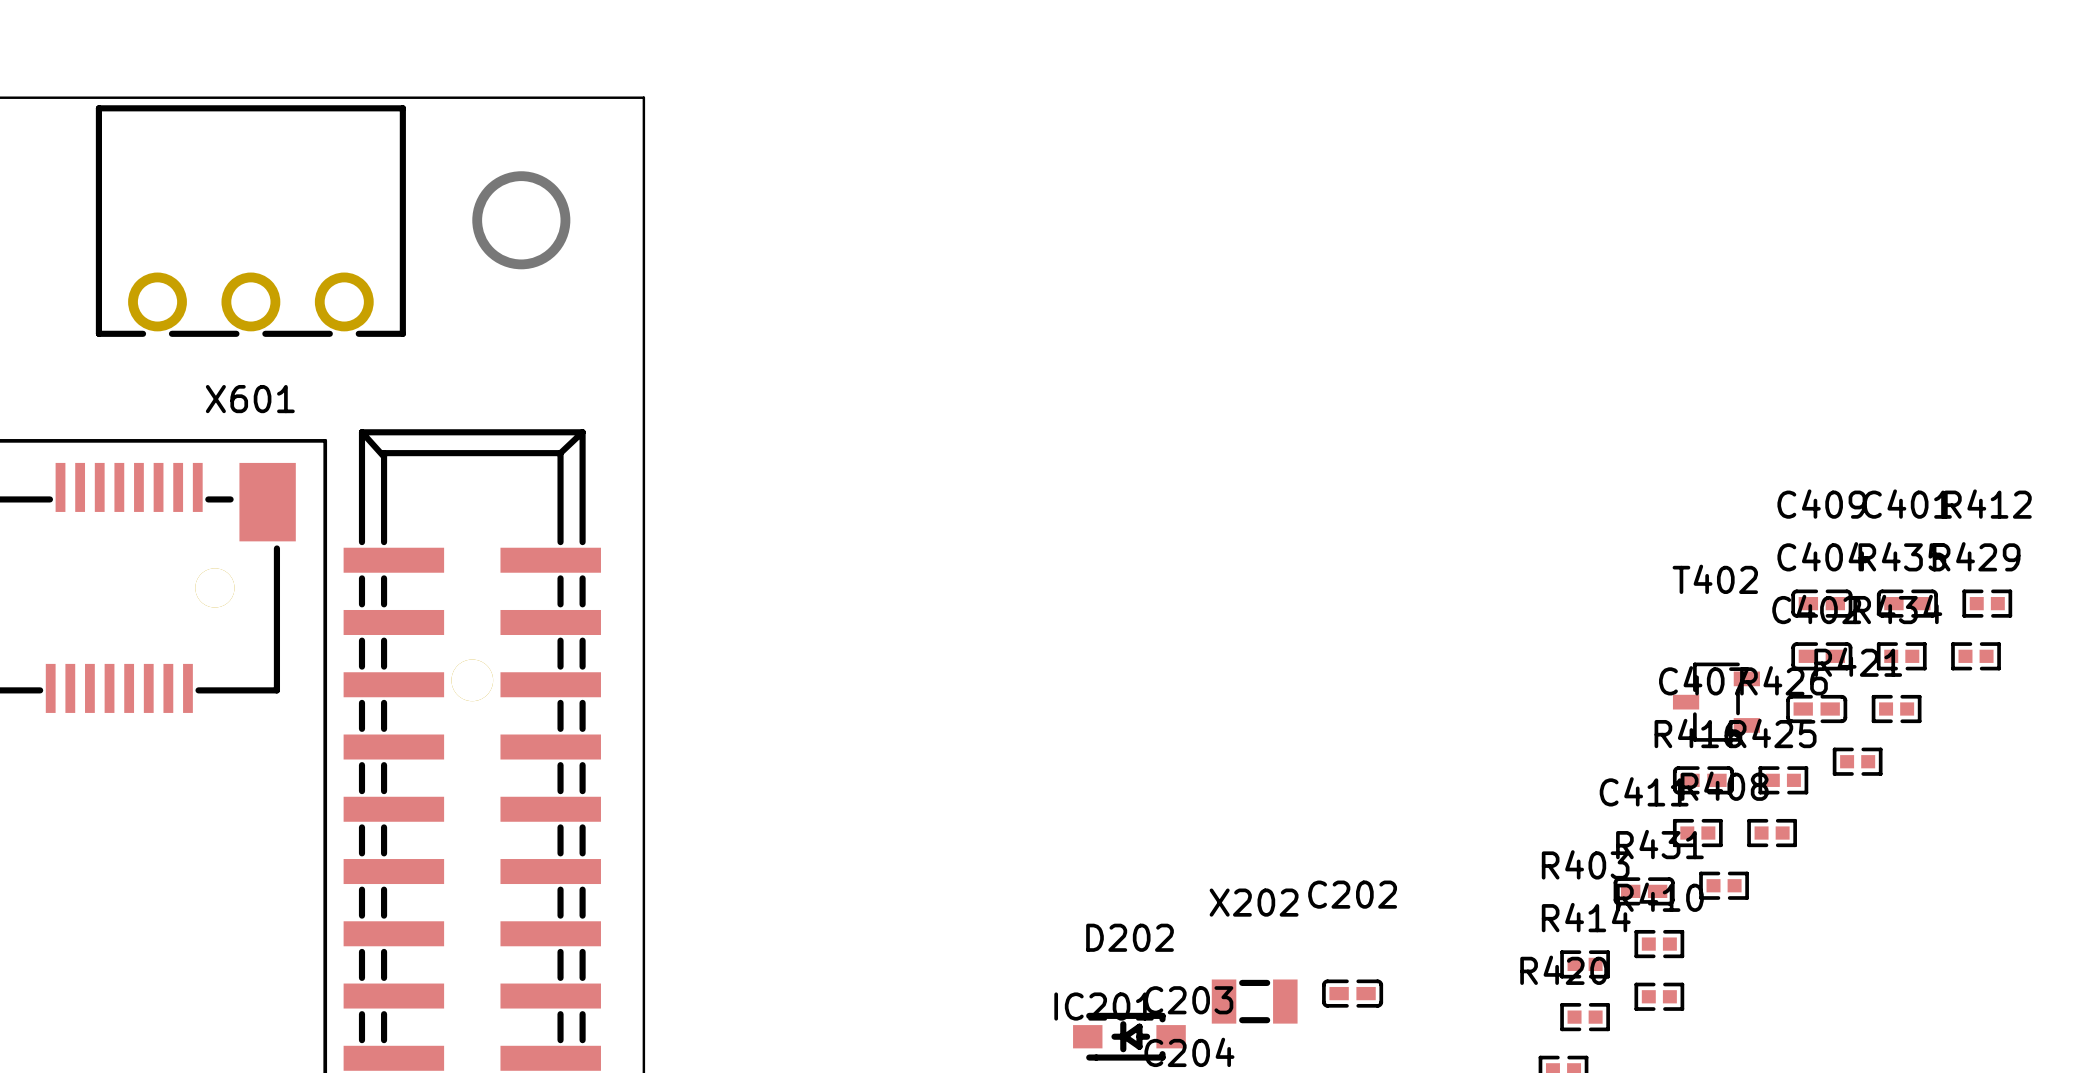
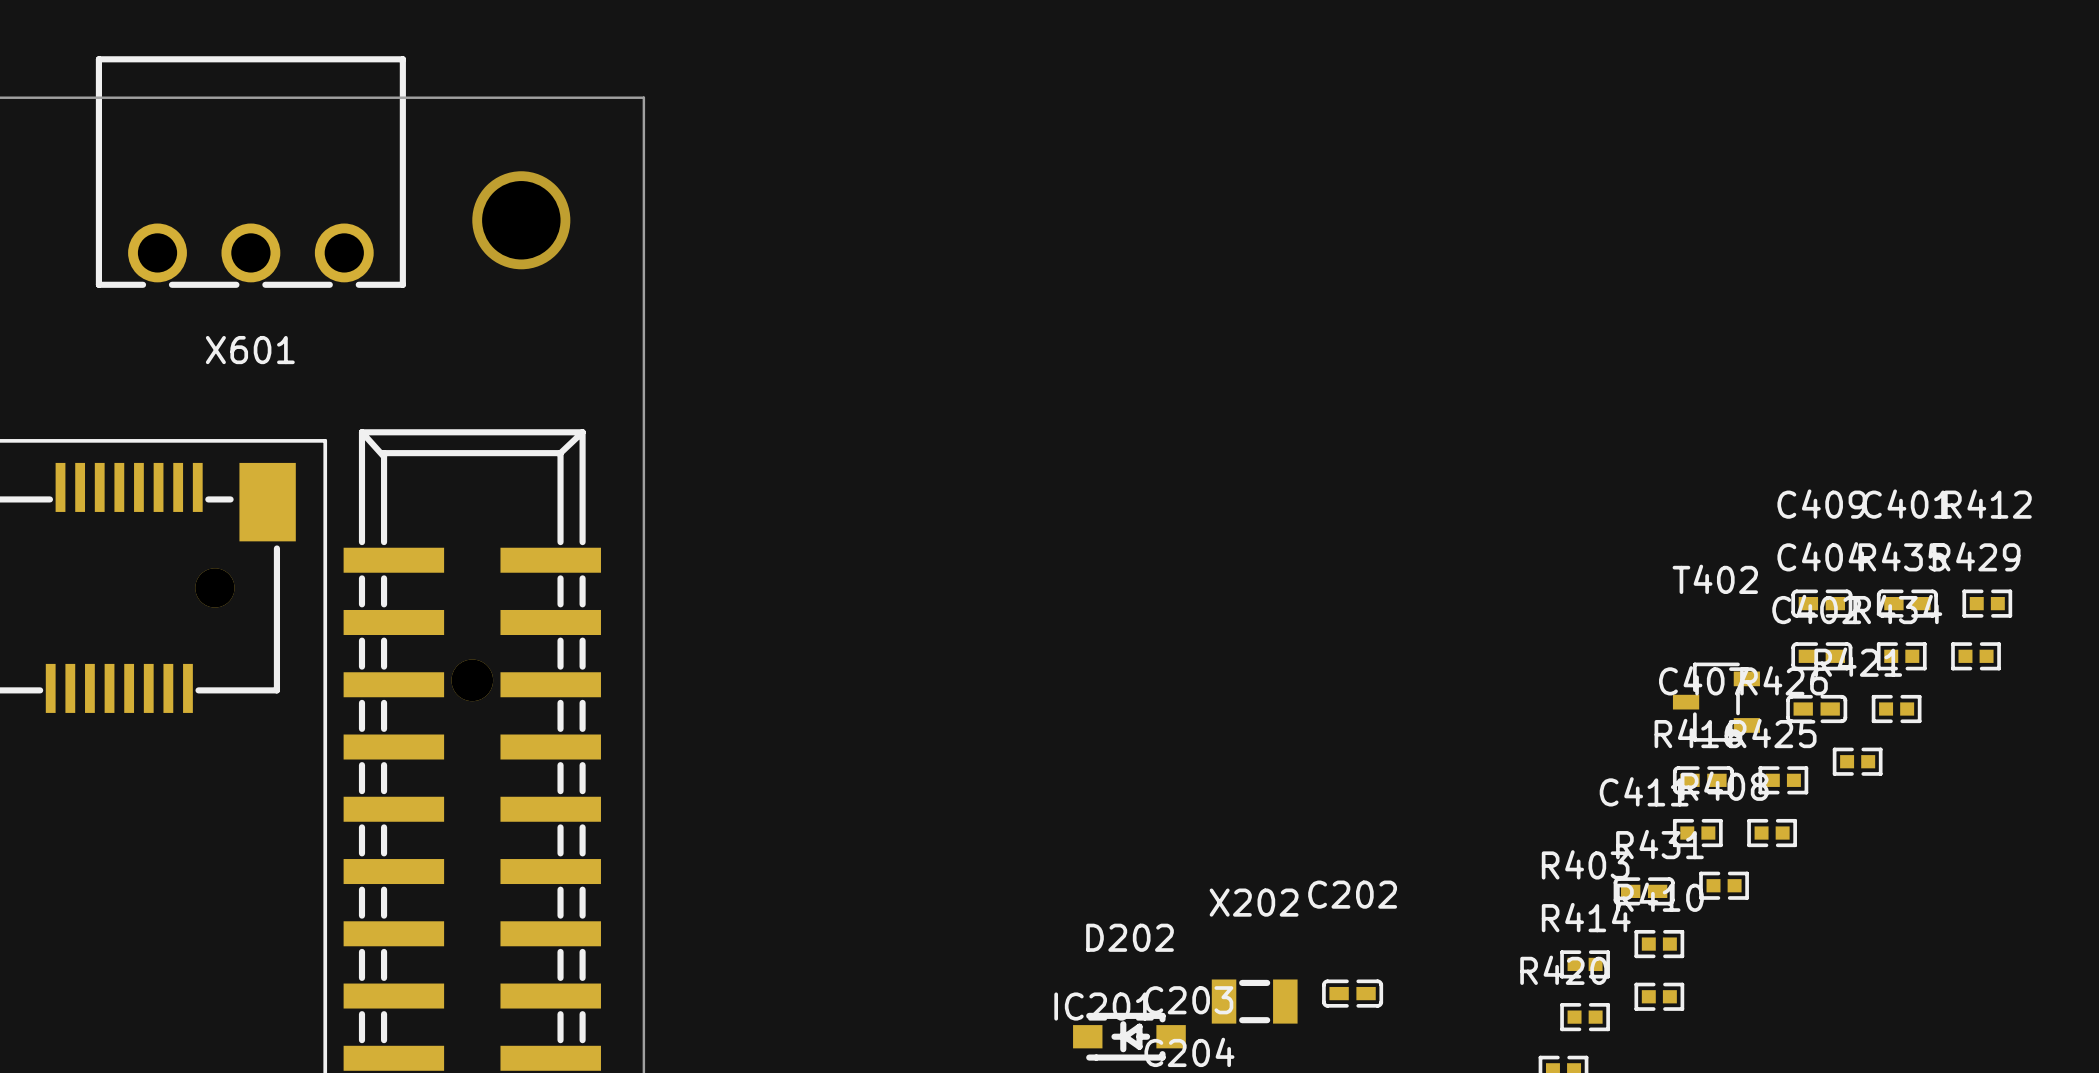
X601 position: (250, 221) -> (250, 172)

